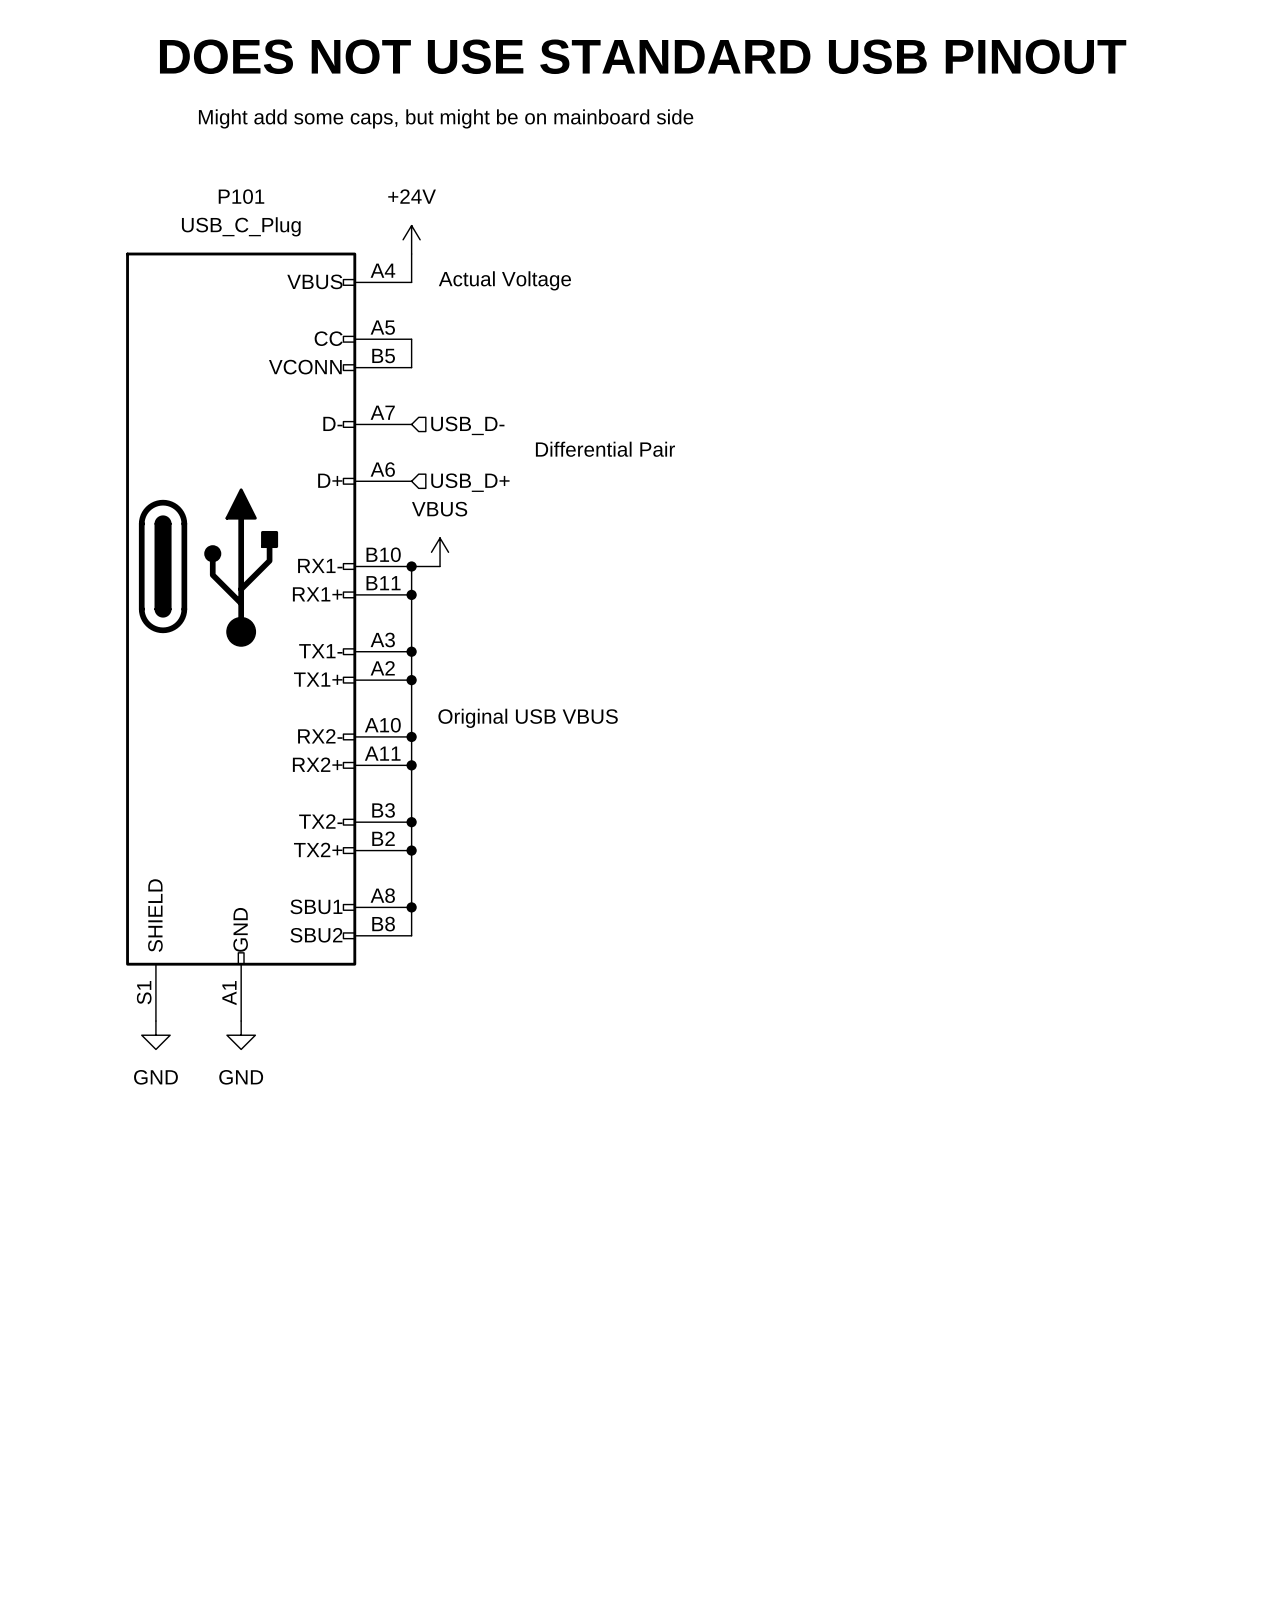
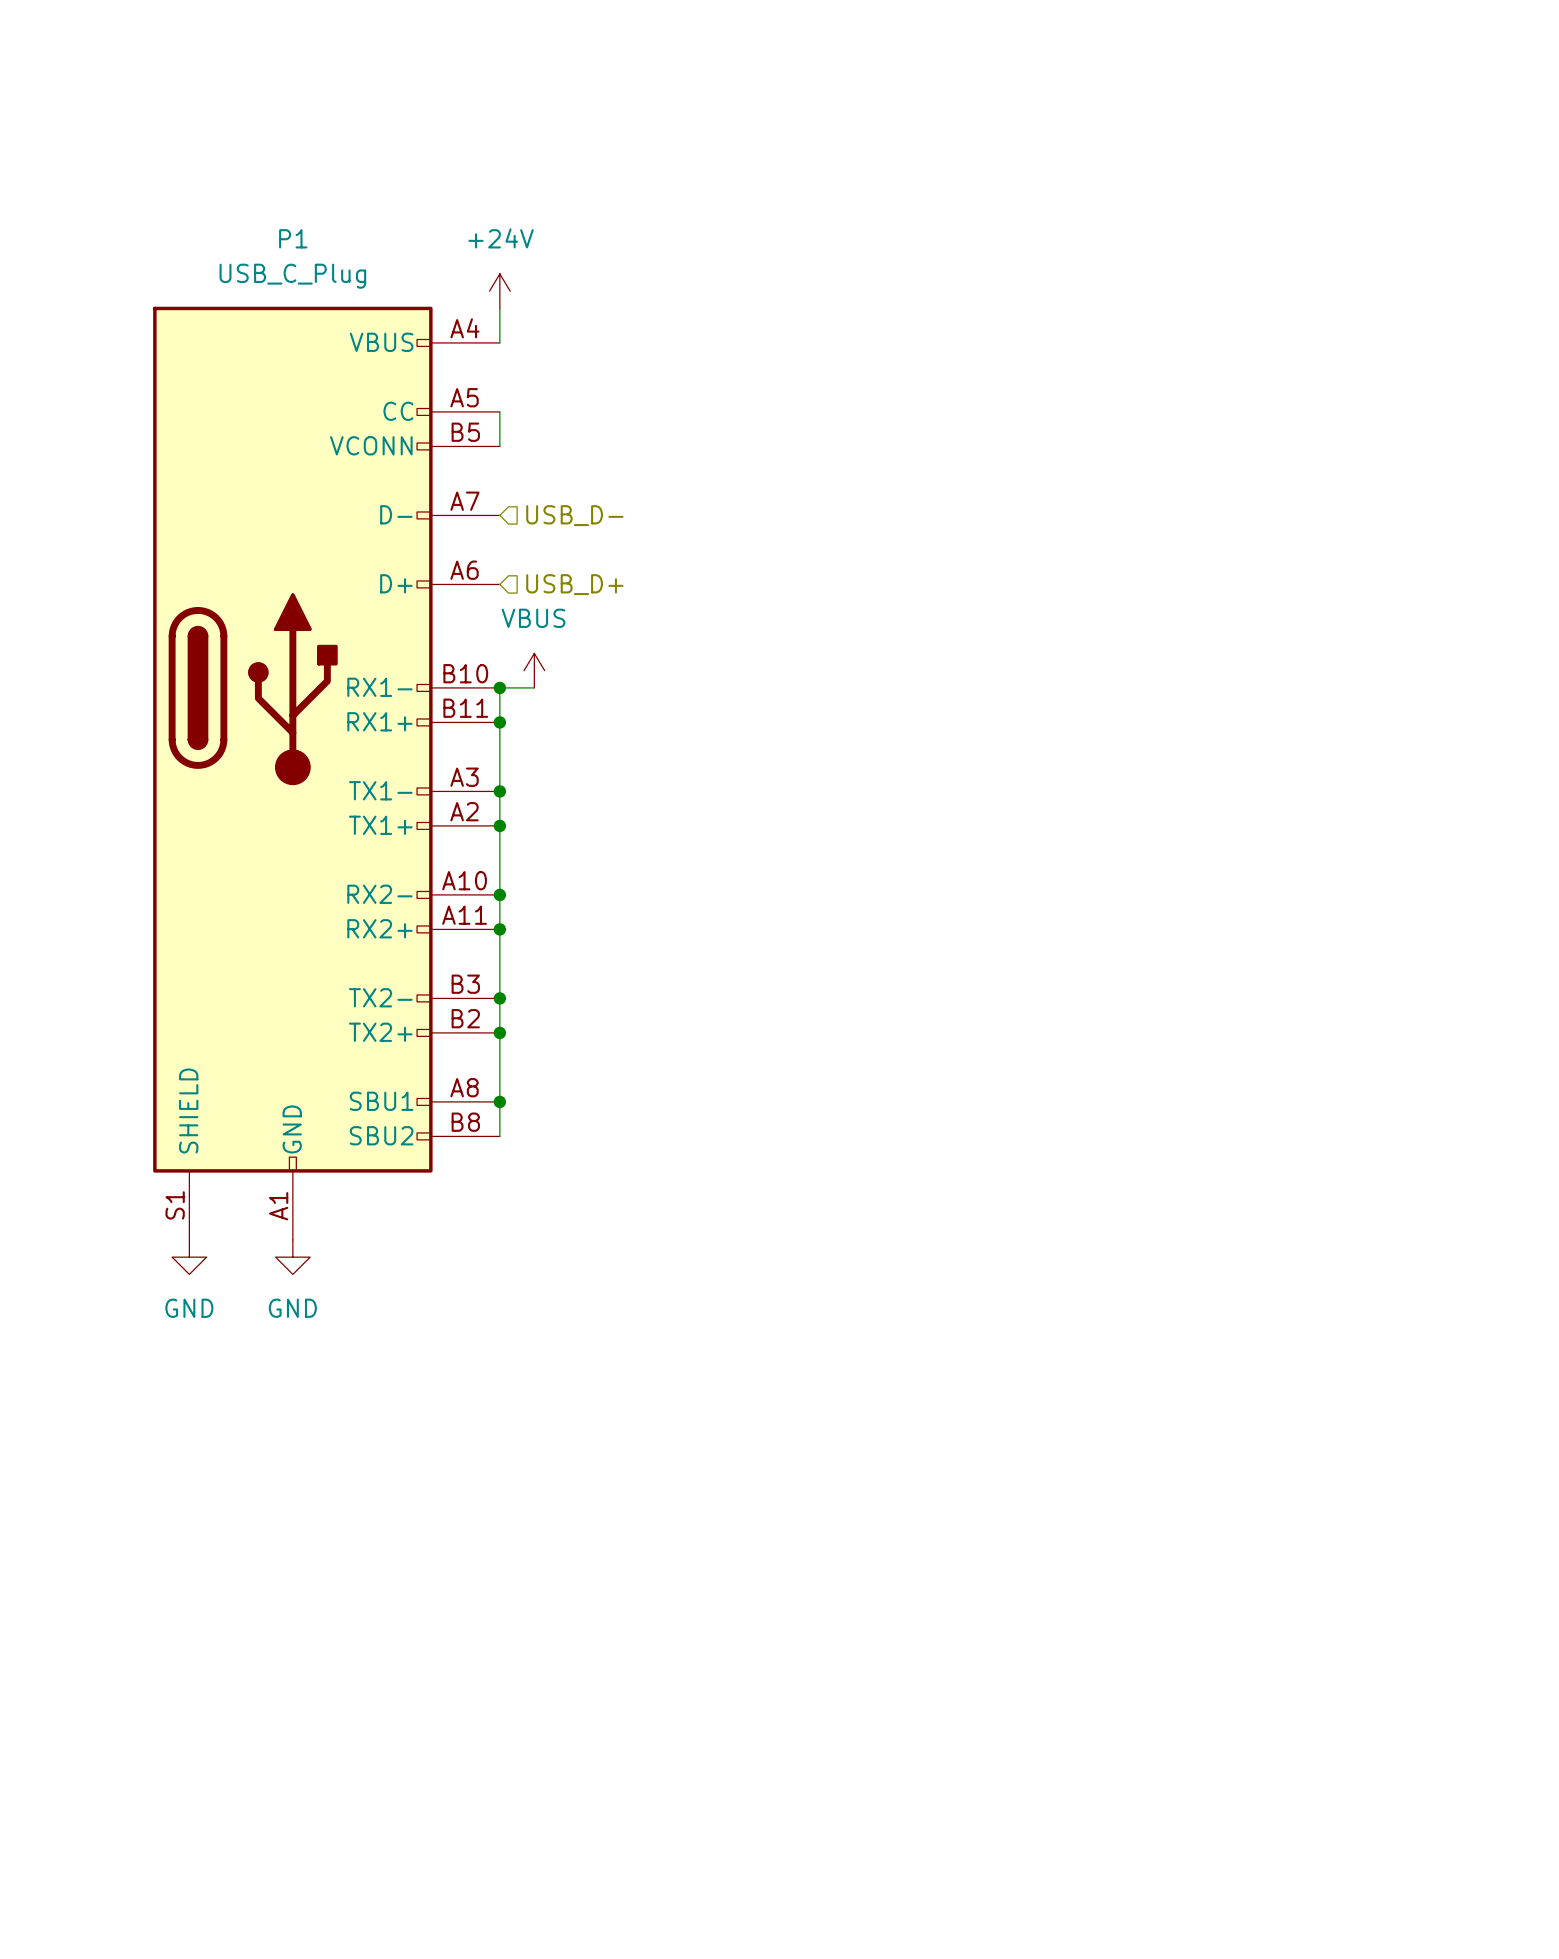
text: DOES NOT USE STANDARD USB PINOUT (643, 56) -> none
text: Might add some caps, but might be on mainboard side (446, 118) -> none
P101 name: P101 (241, 196) -> P1 (293, 238)
text: Actual Voltage (504, 280) -> none
text: Differential Pair (605, 449) -> none
text: Original USB VBUS (528, 718) -> none

